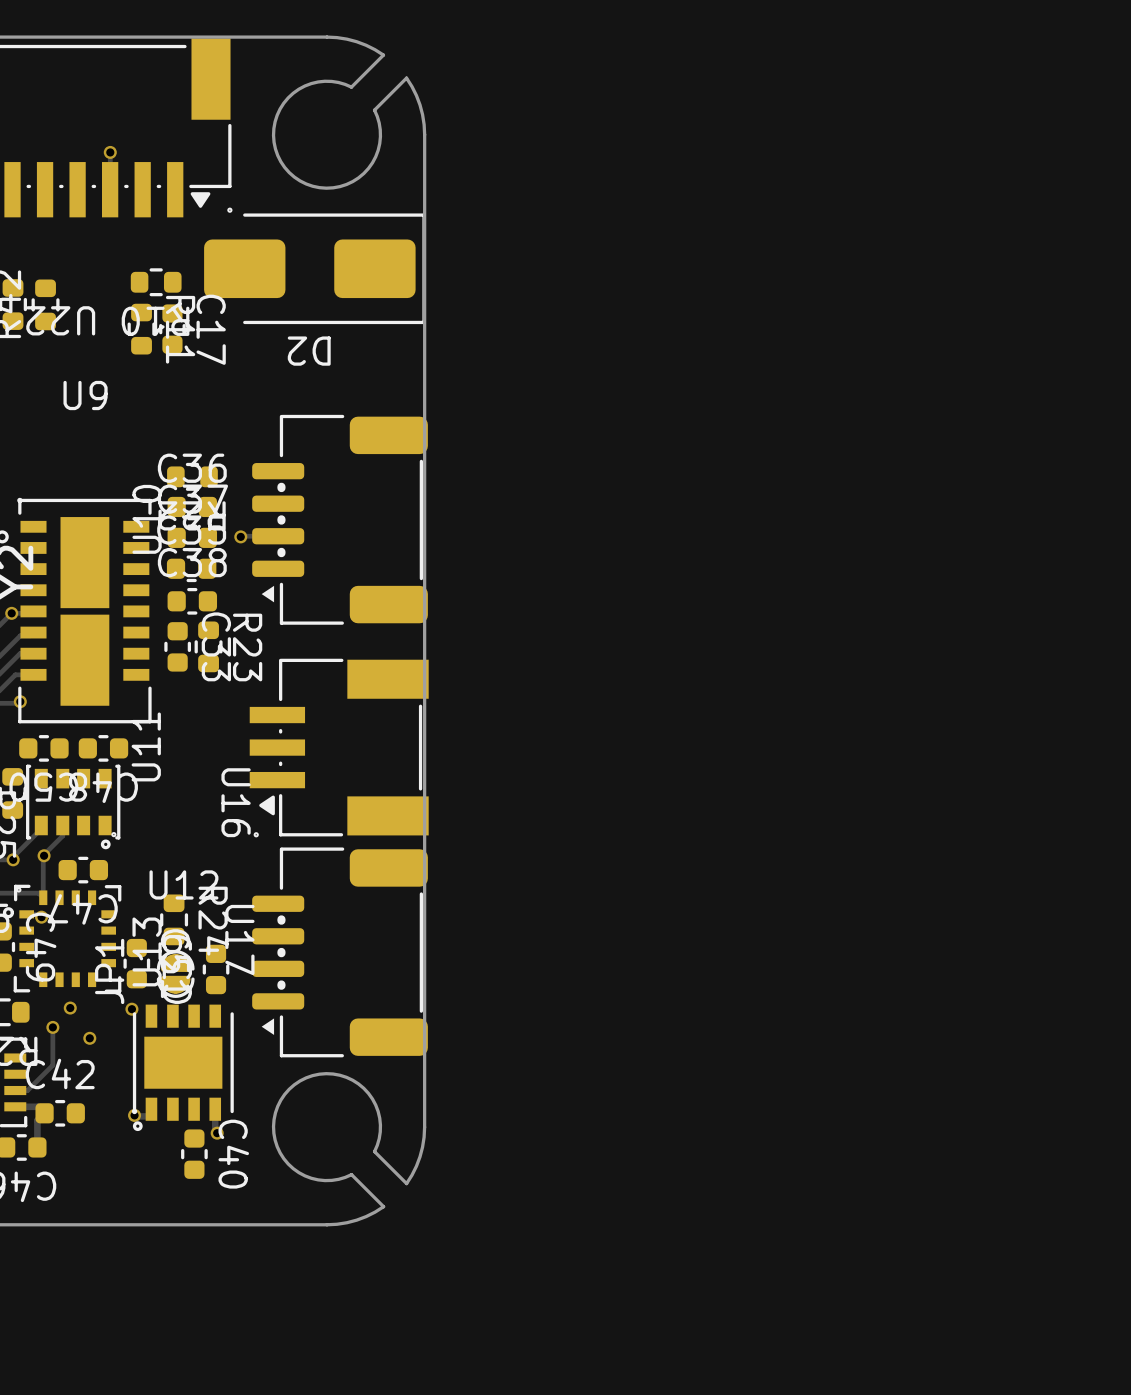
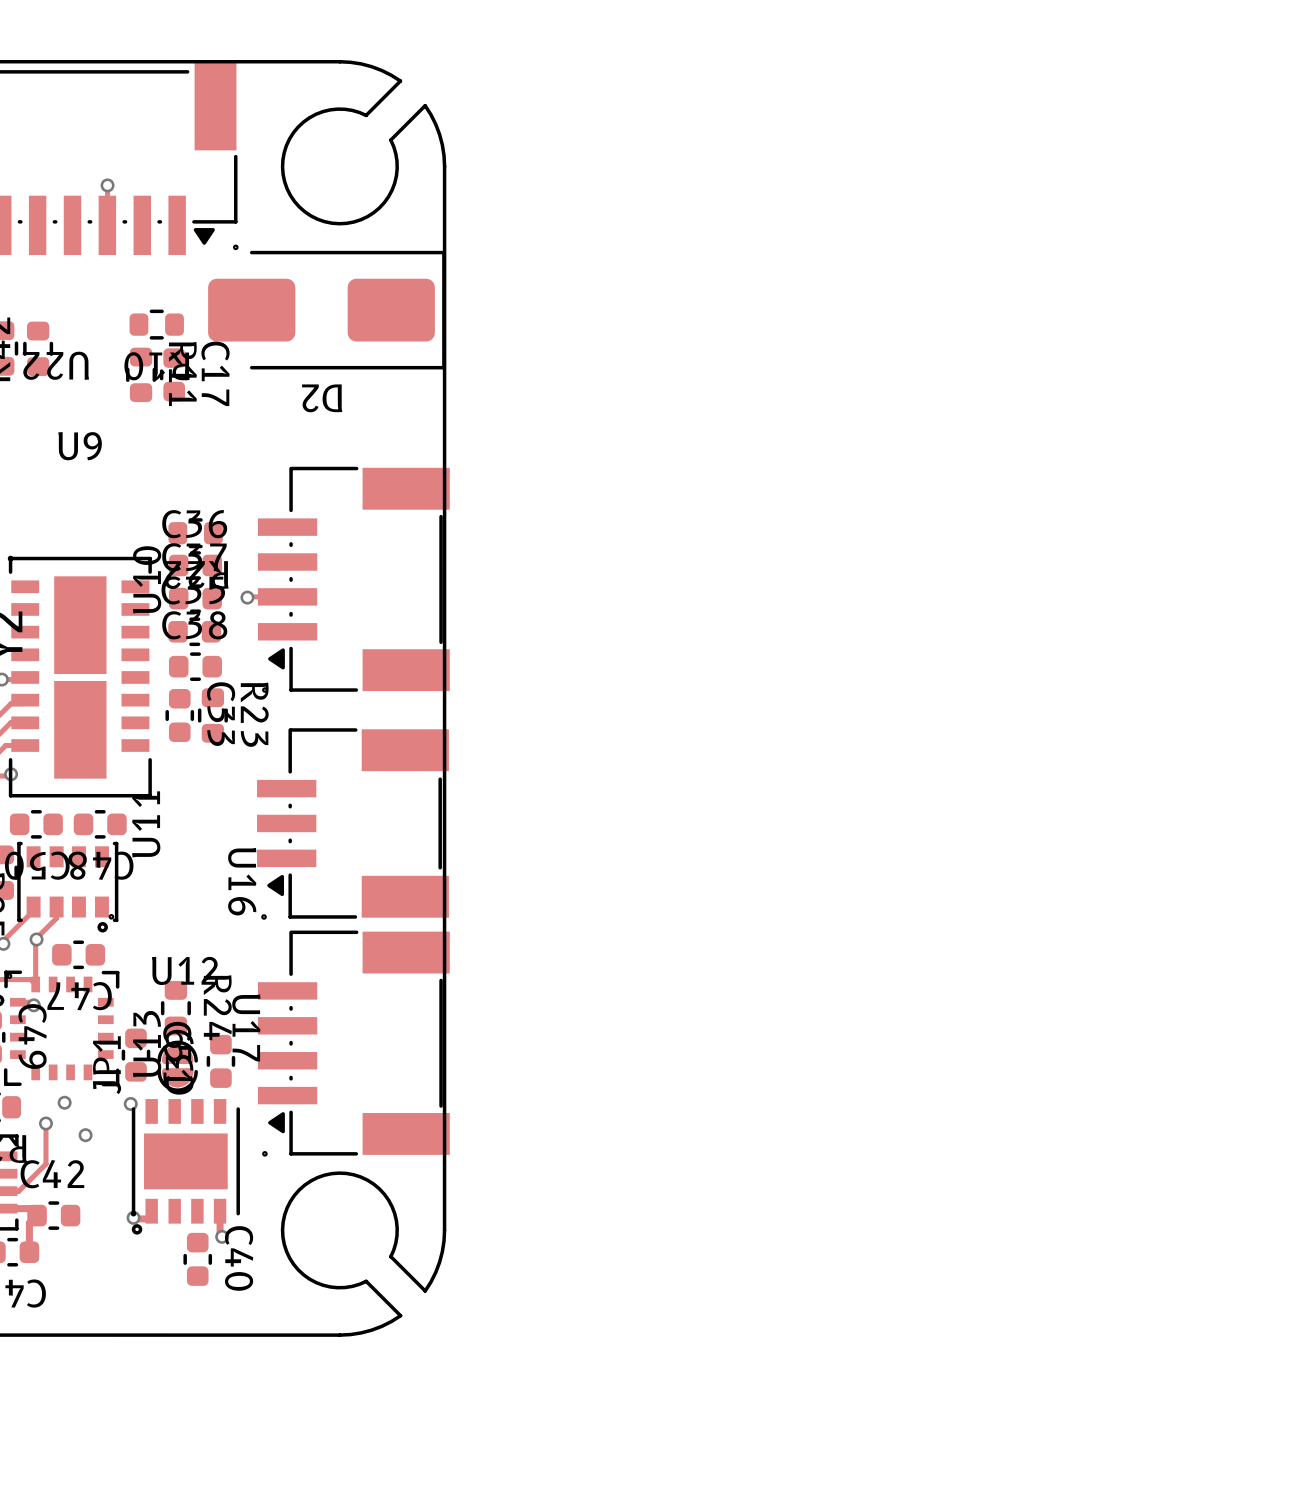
U10 footprint: [252, 414, 428, 625] -> [257, 466, 450, 693]
U13 footprint: [252, 847, 428, 1058] -> [257, 930, 450, 1157]

